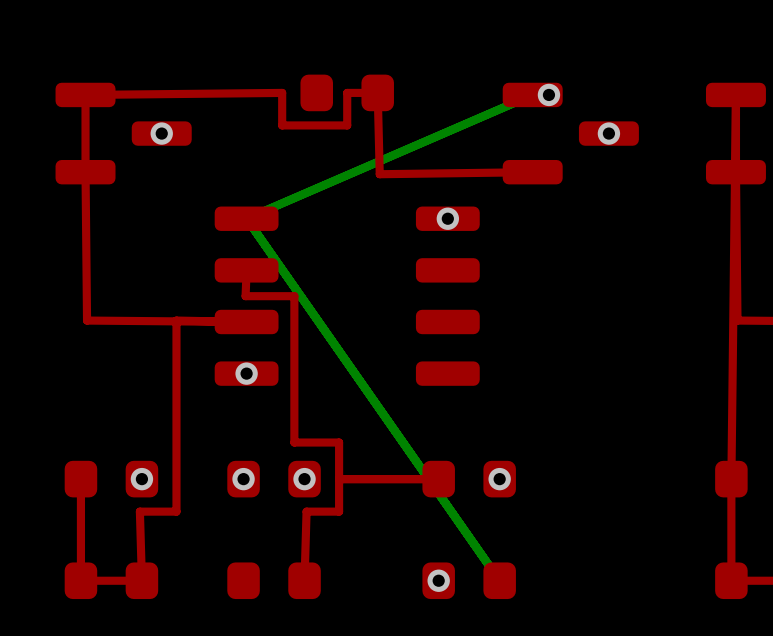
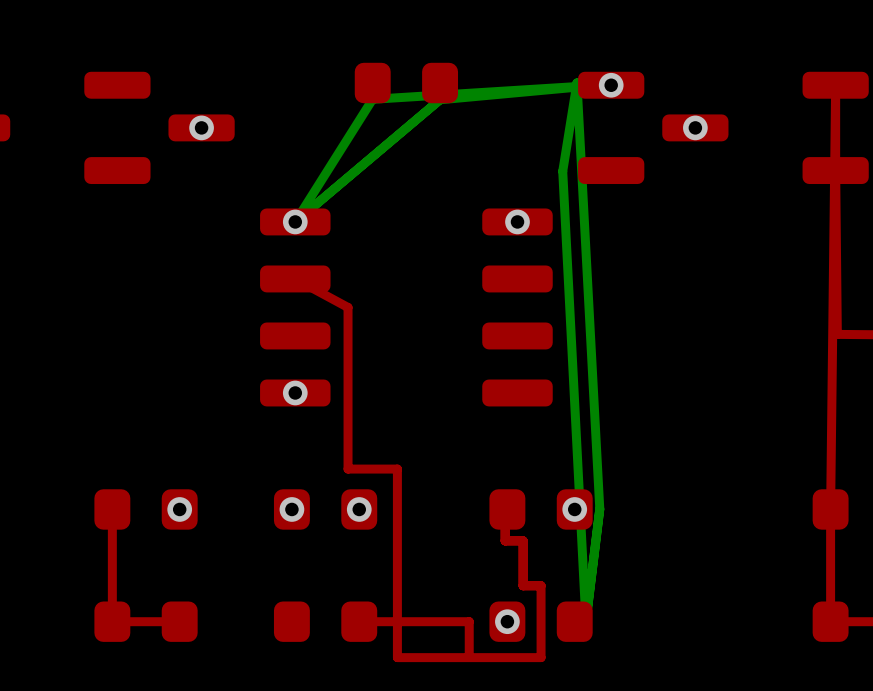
bottom track: none -> (576, 83) (562, 171) (585, 621) (599, 509) (576, 83)
bottom track: none -> (597, 85) (439, 99) (295, 221) (372, 99) (597, 85)
bottom track: (548, 94) (532, 94) (246, 218) (499, 580) -> none
via position: (548, 94) -> (611, 85)
top track: (532, 172) (379, 174) (377, 92) (347, 92) (347, 125) (282, 125) (282, 92) (85, 94) (87, 320) (246, 321) (176, 320) (176, 511) (139, 511) (141, 580) (139, 580) -> none
via: none -> (295, 221)
top track: (246, 270) (245, 296) (294, 296) -> (295, 278) (348, 307)
top track: (339, 511) (306, 511) (304, 580) -> (397, 545) (397, 657) (541, 657) (541, 585) (523, 585) (523, 540) (505, 540) (505, 509)
top track: none -> (361, 621) (469, 621) (469, 657)

